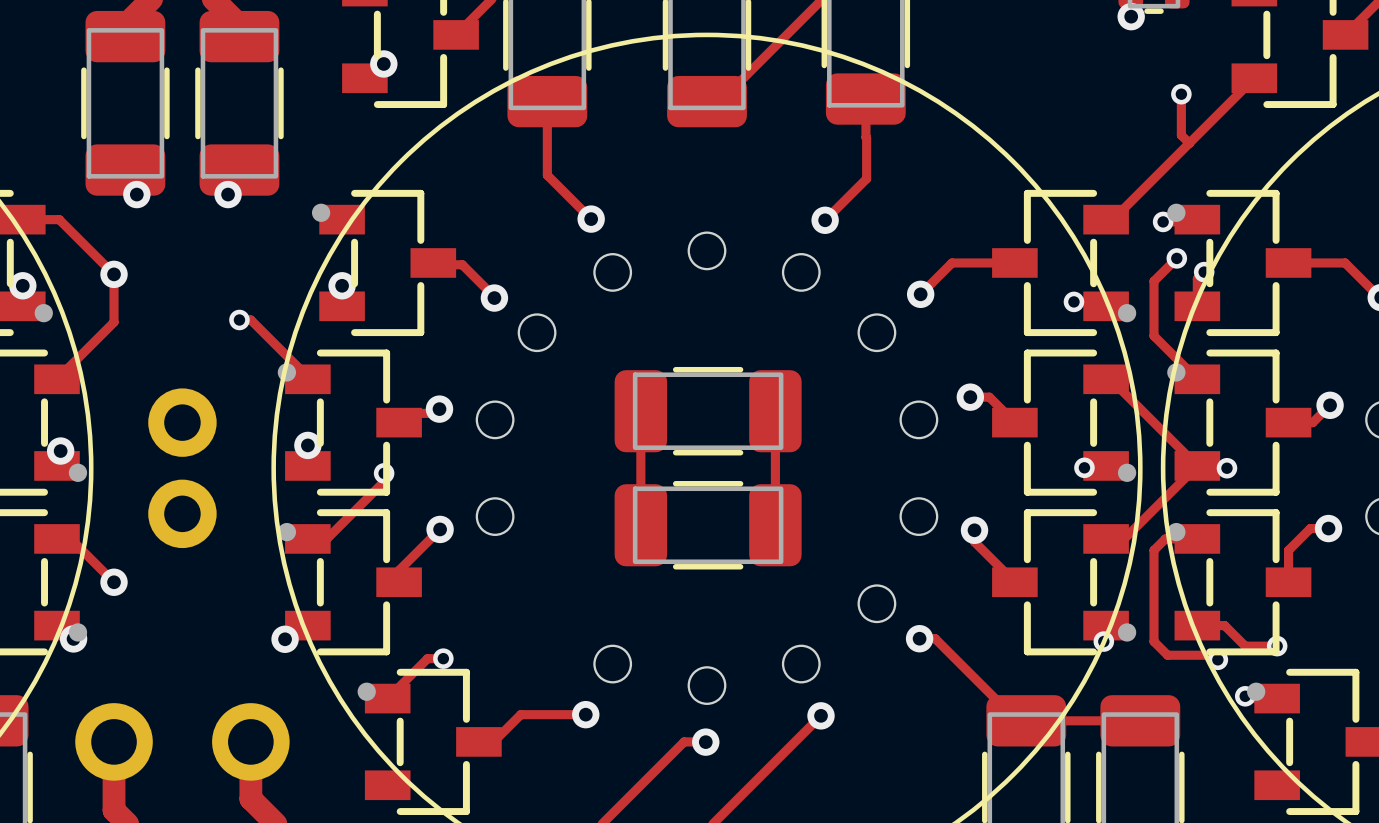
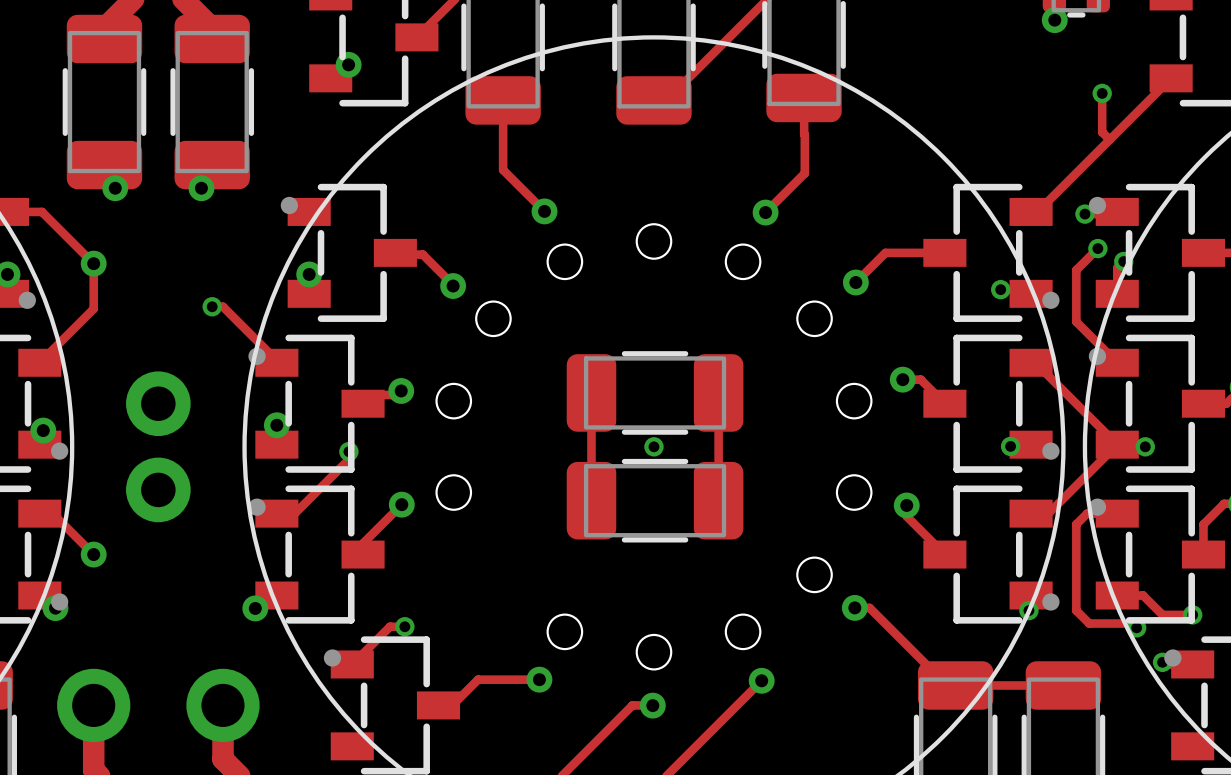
via: none -> (653, 446)

